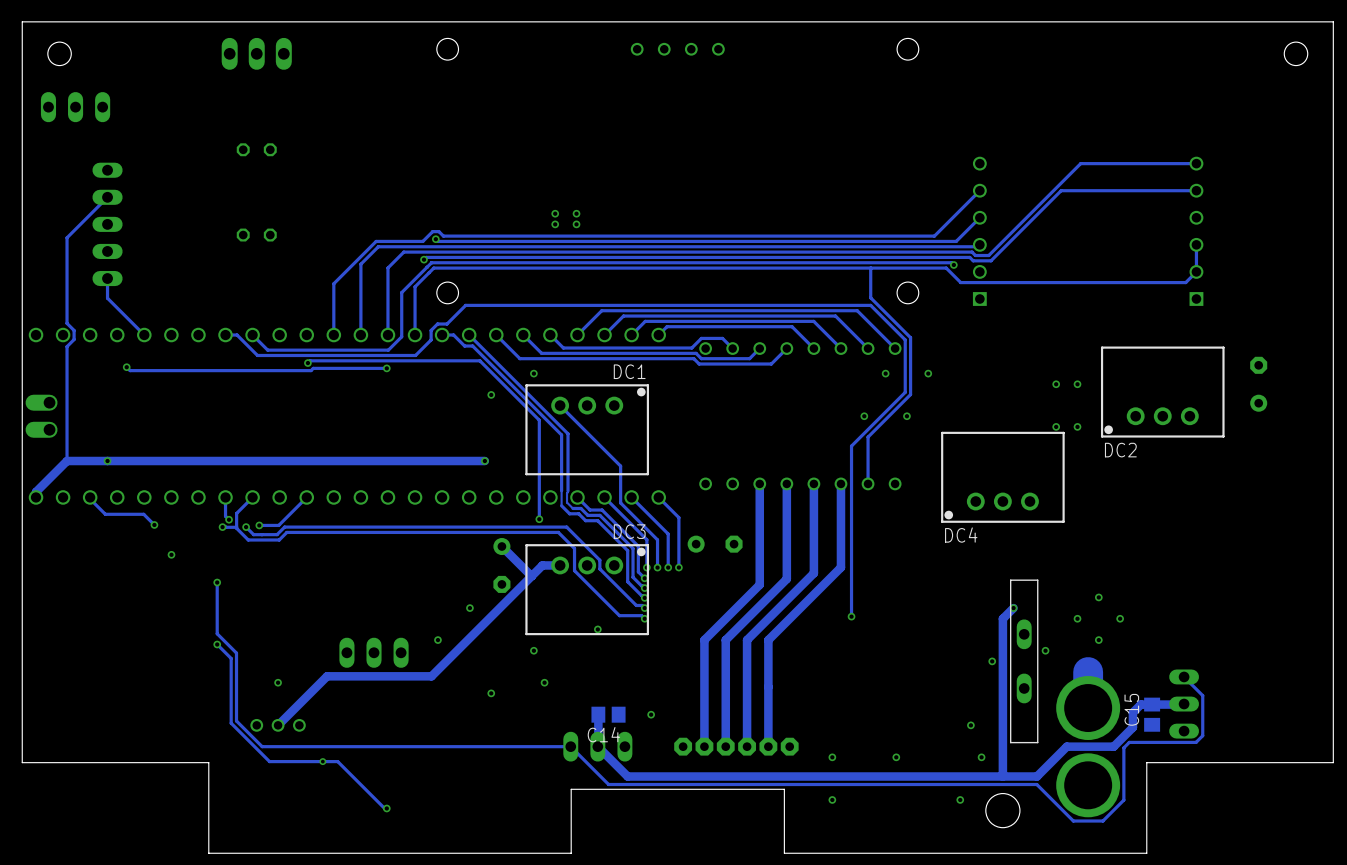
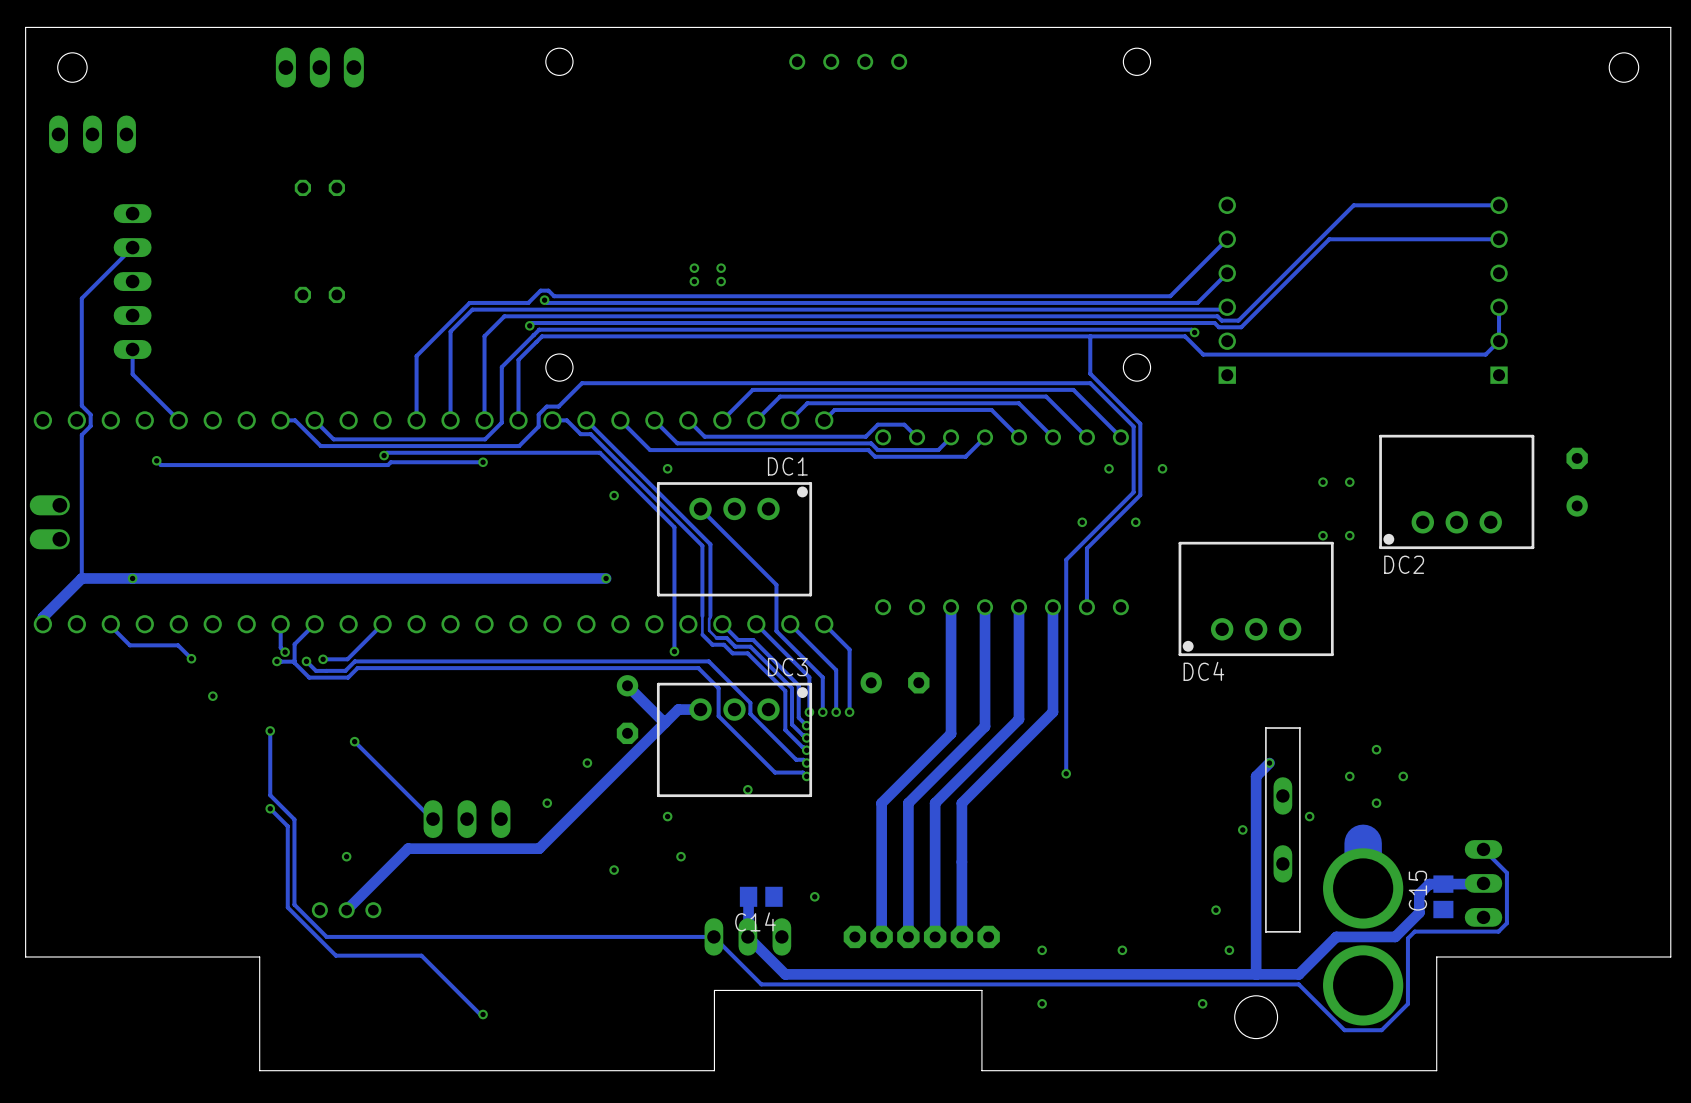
track: none -> (354, 741) (433, 819)
via: none -> (354, 741)
via: (322, 761) -> none

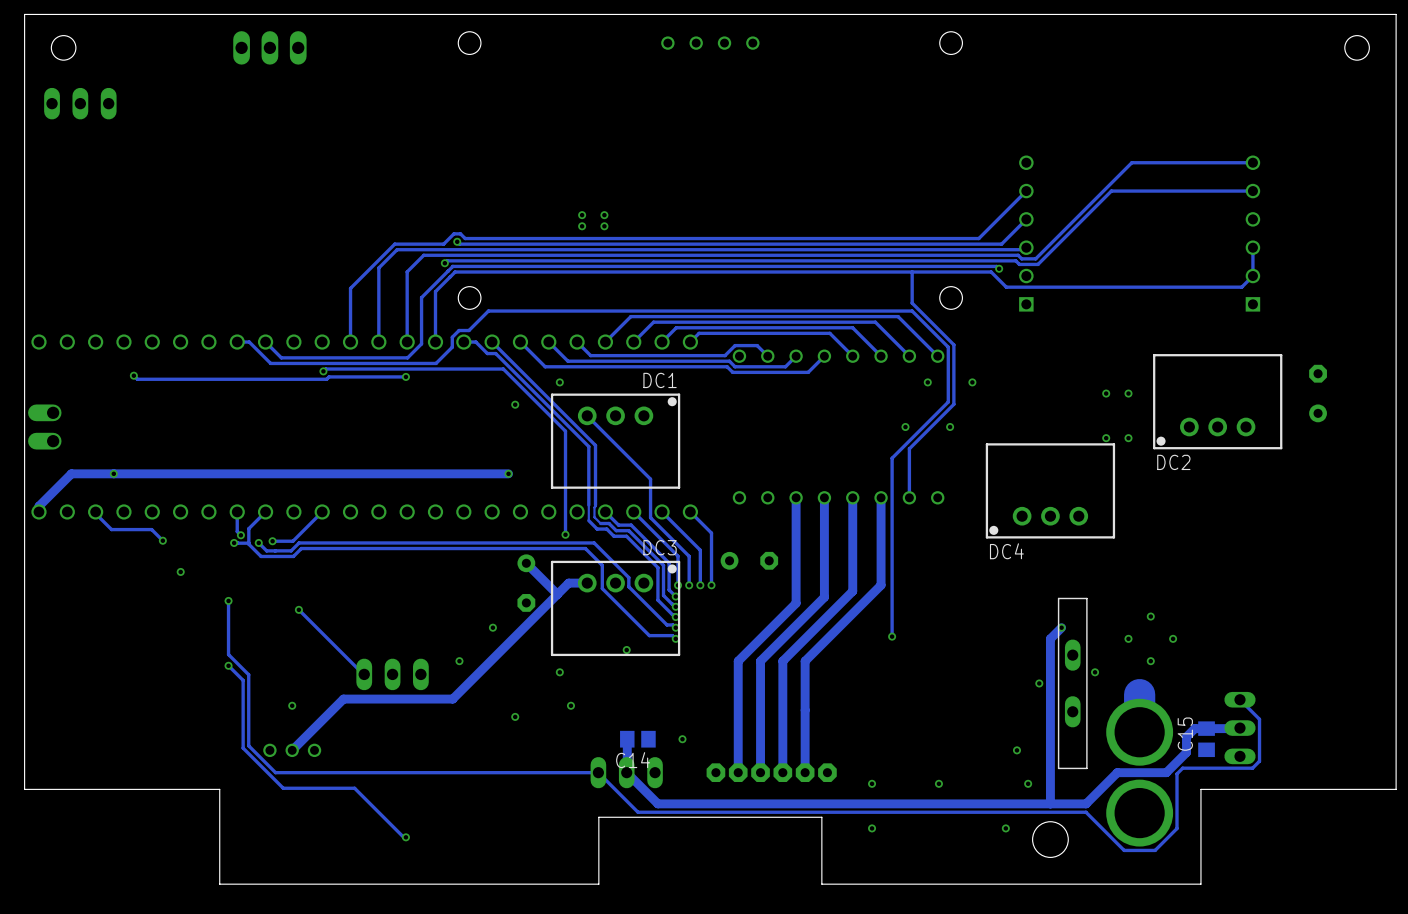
part: (319, 187) -> none
track: (132, 247) (81, 298) (81, 405) (90, 414) (90, 426) (81, 434) (81, 578) -> none
part: (132, 281) -> none
part: (319, 294) -> none
track: (132, 349) (132, 374) (178, 420) -> none

